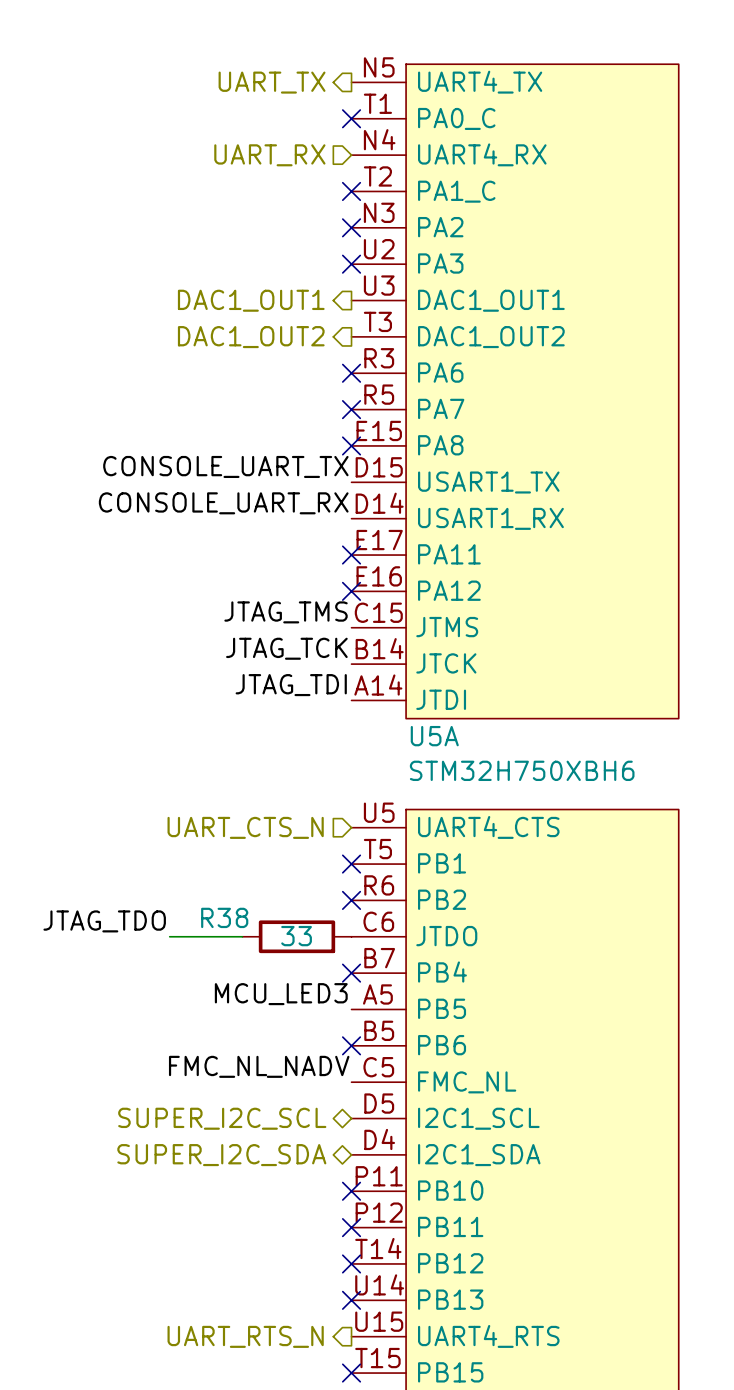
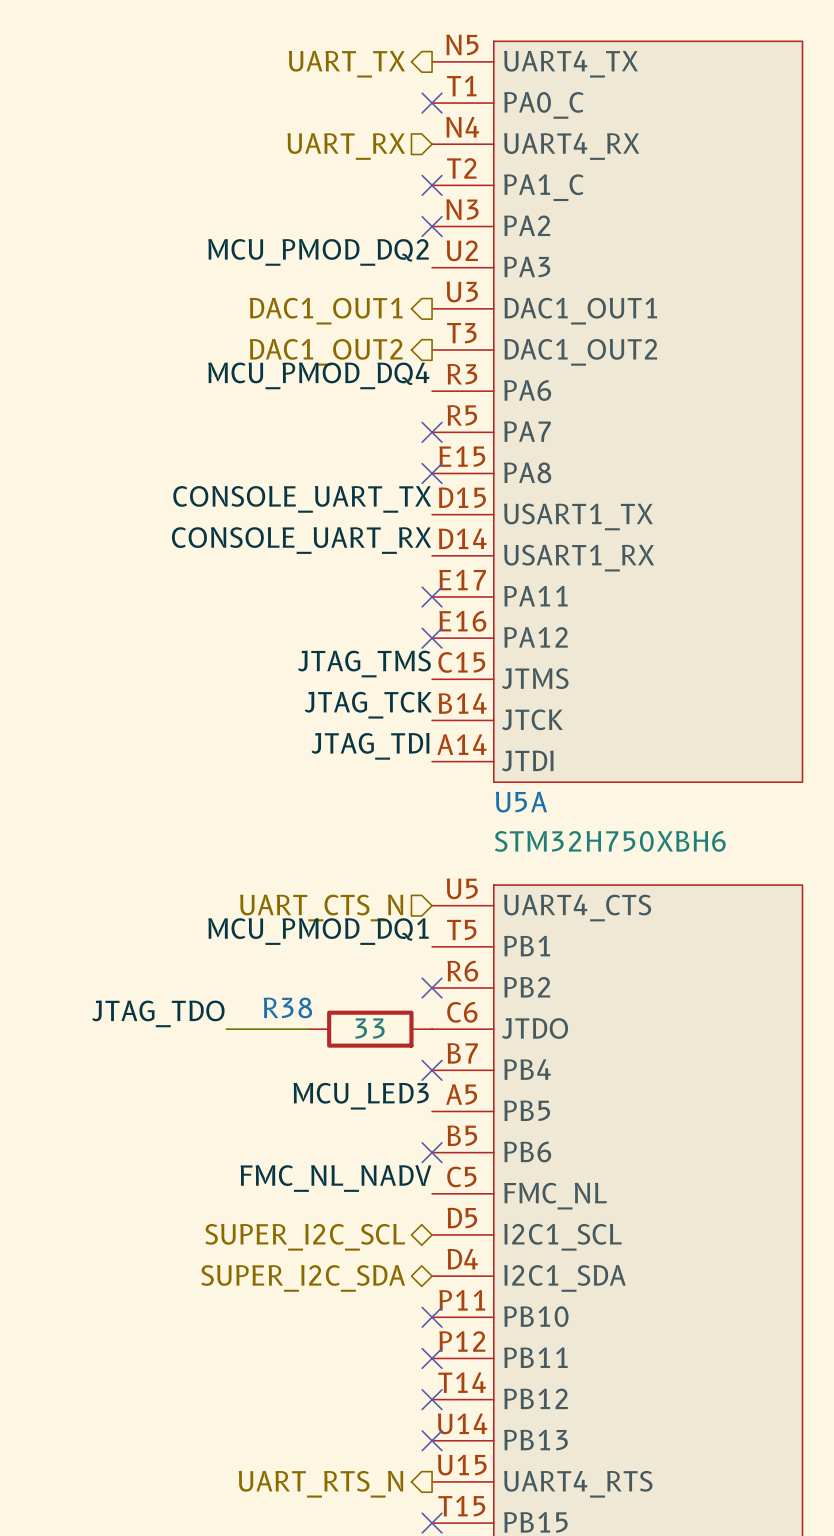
label: none -> MCU_PMOD_DQ2 (318, 252)
no-connect mark: (351, 264) -> none
label: none -> MCU_PMOD_DQ4 (318, 375)
no-connect mark: (351, 373) -> none
label: none -> MCU_PMOD_DQ1 (318, 931)
no-connect mark: (351, 864) -> none

